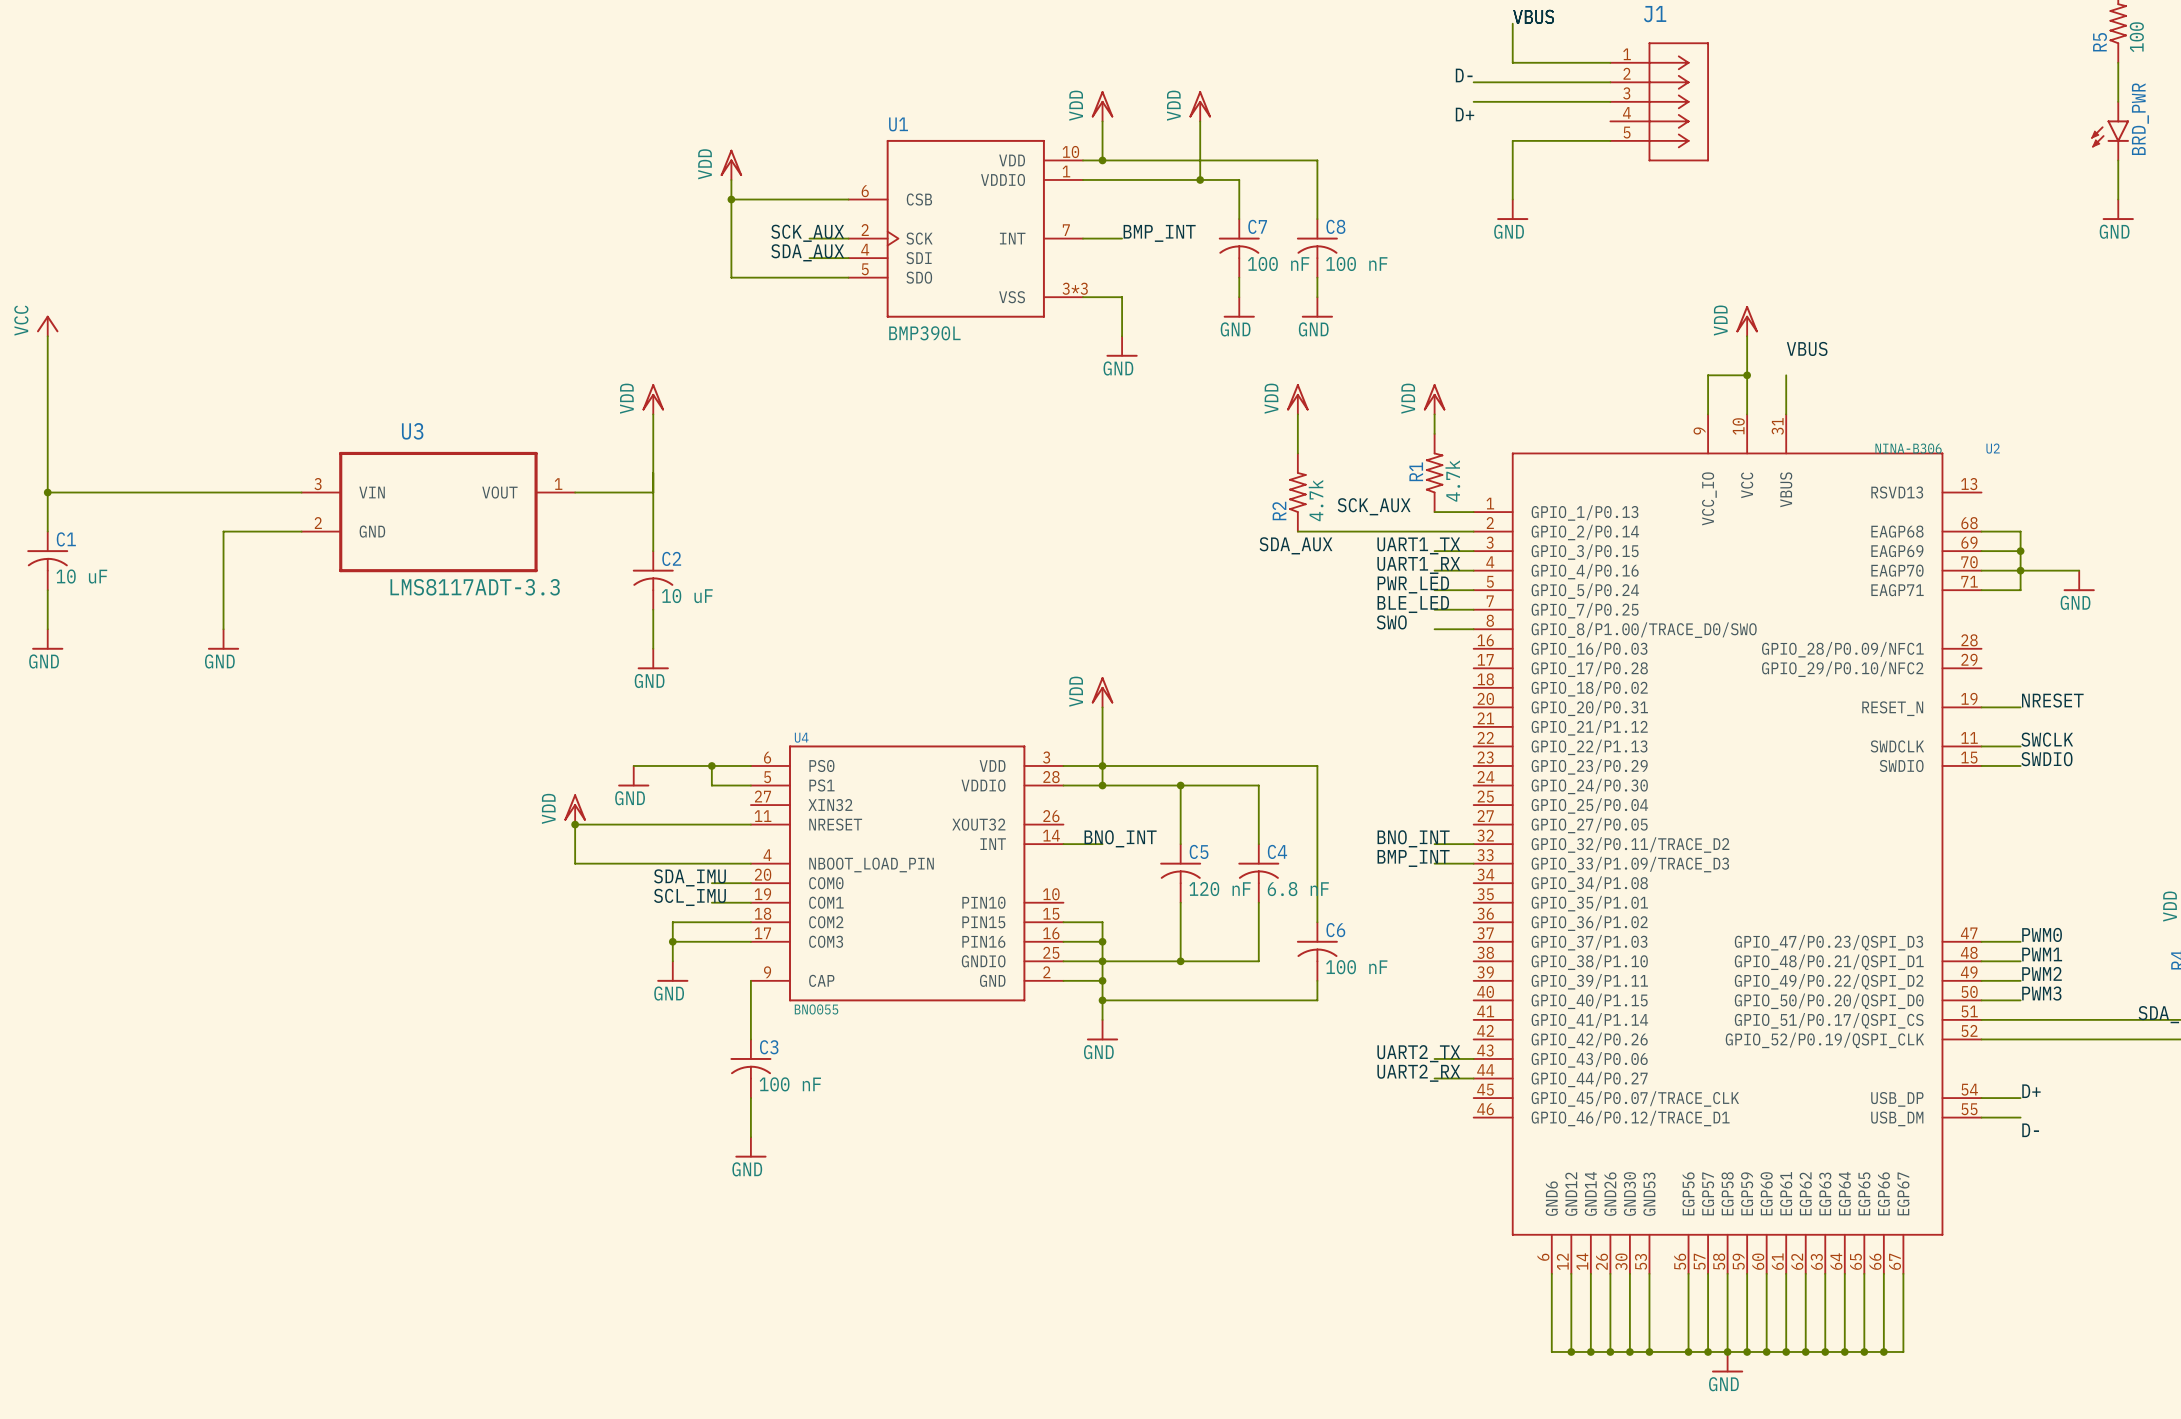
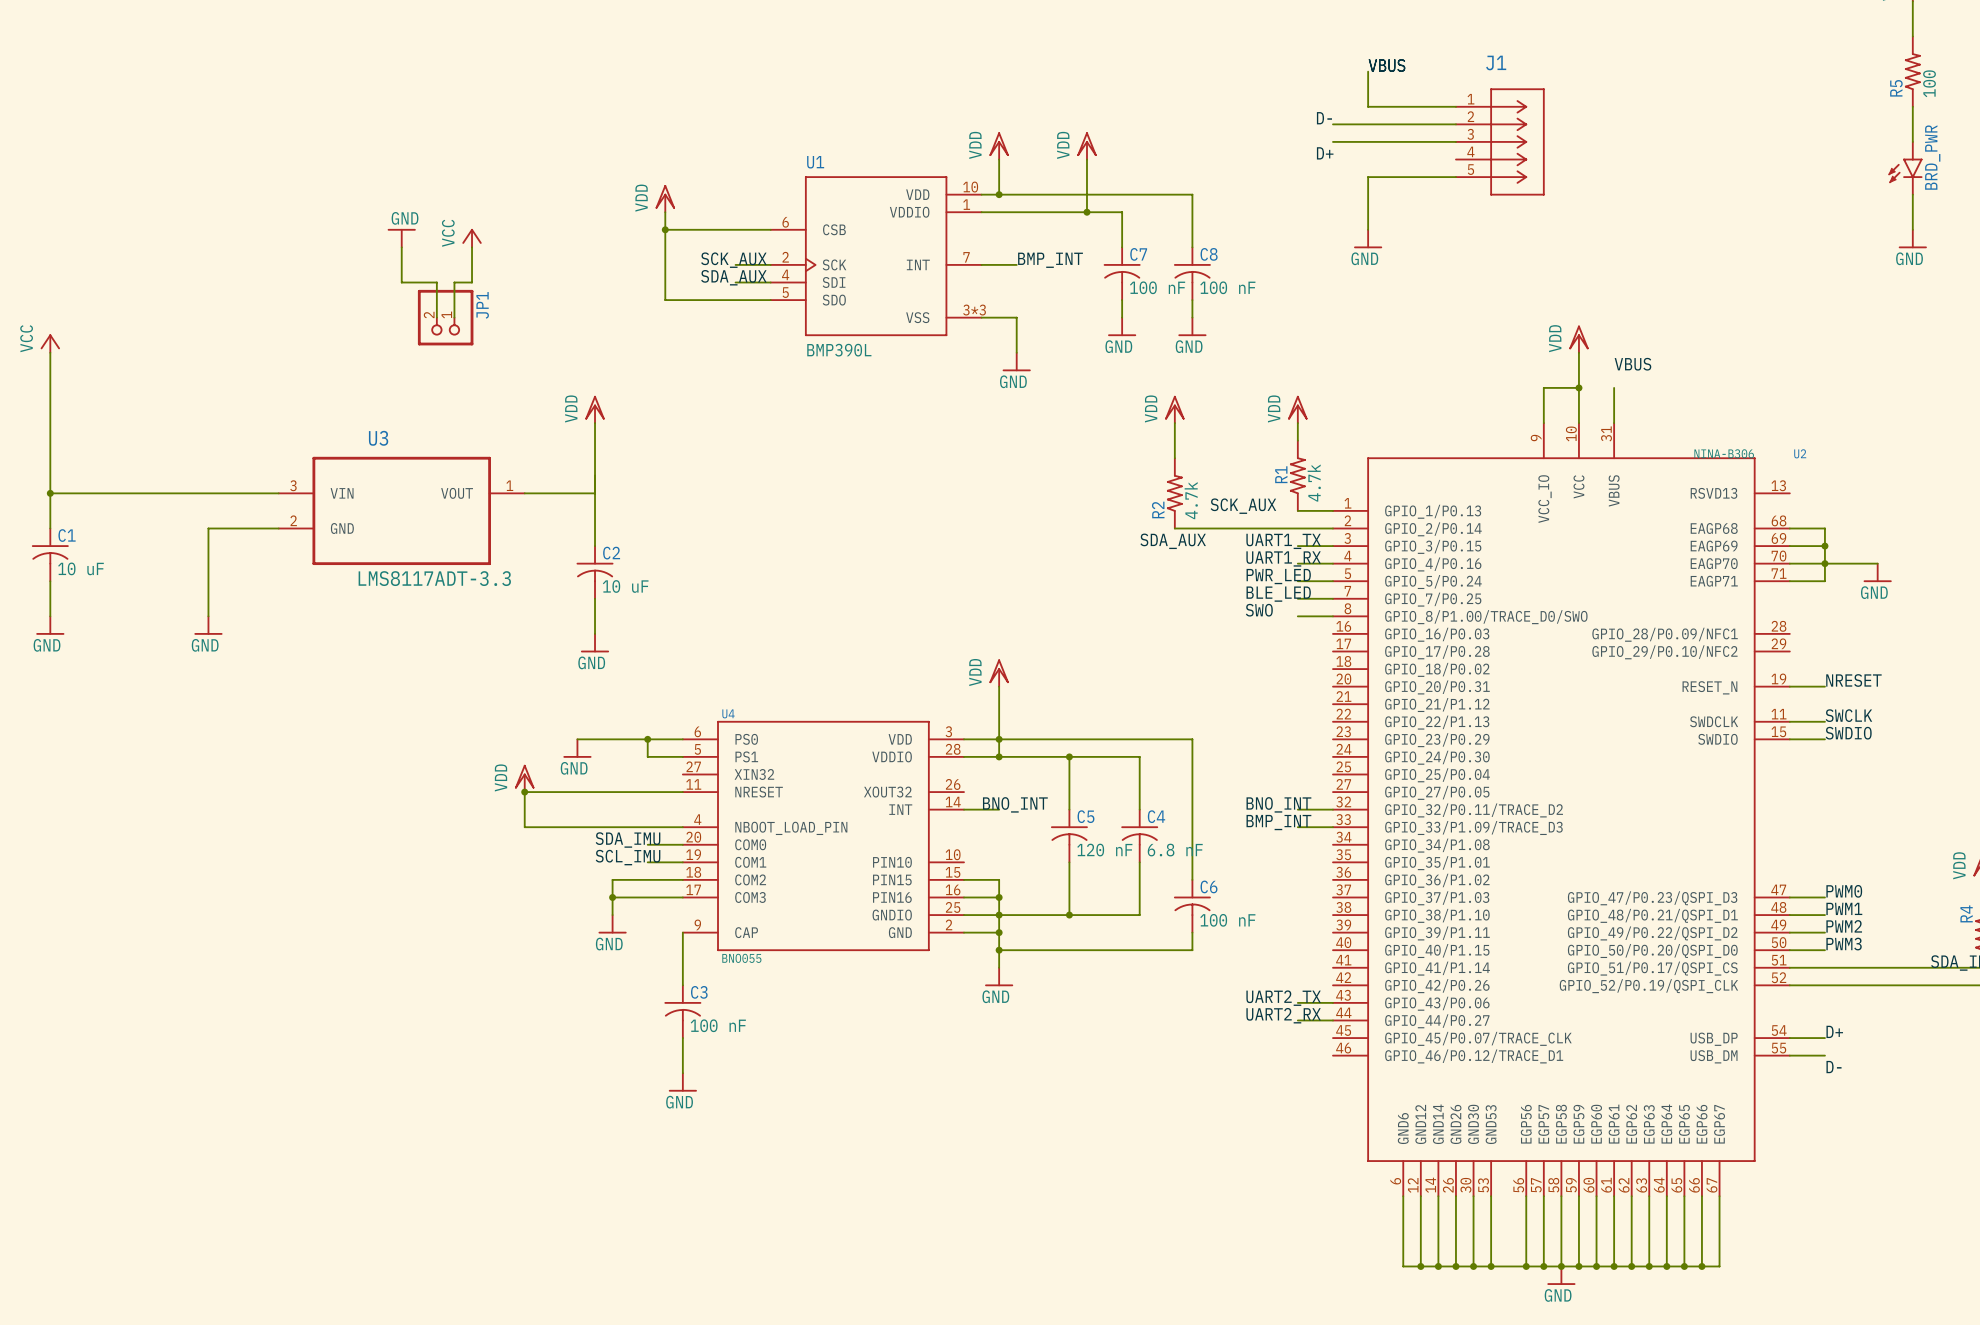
power symbol: none -> GND (401, 238)
power symbol: none -> VCC (472, 238)
wire: none -> (401, 247) (401, 282) (436, 282) (436, 317)
wire: none -> (472, 247) (472, 282) (454, 282) (454, 317)
JP1: none -> (445, 317)

